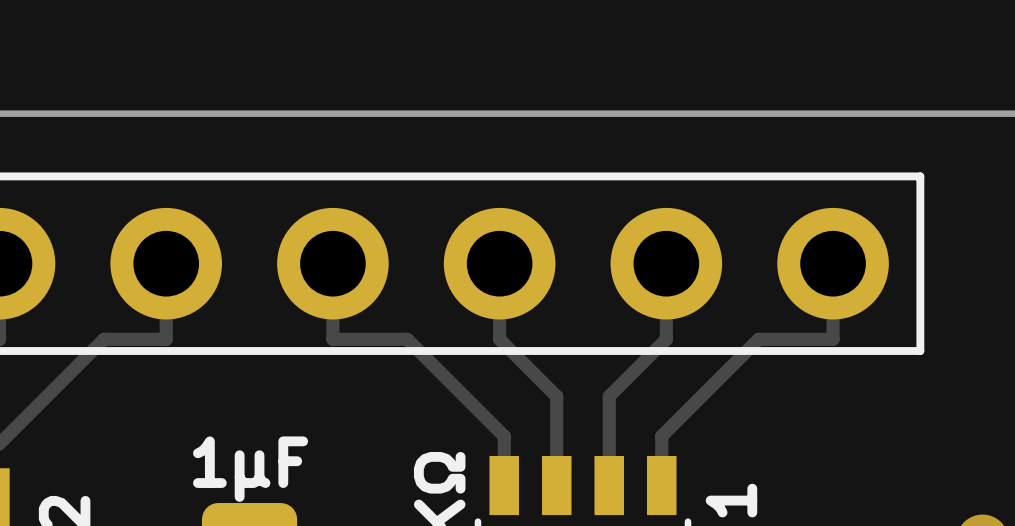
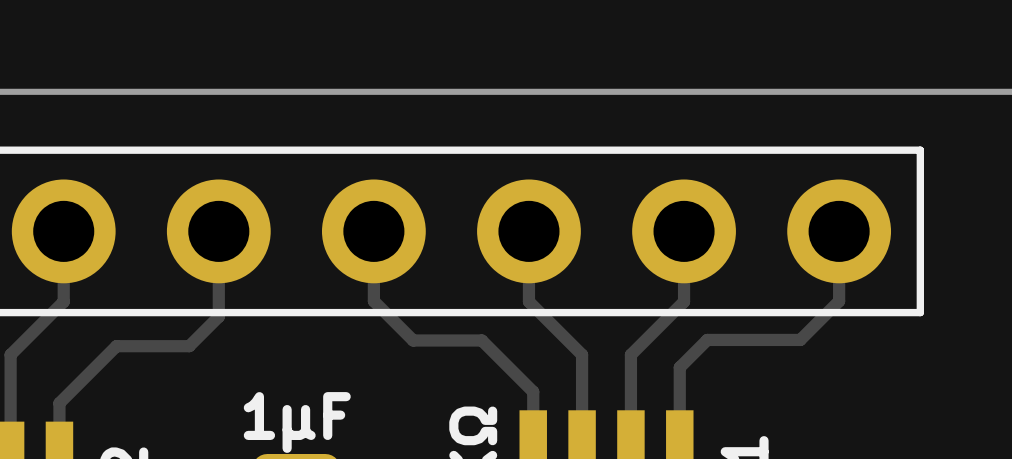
track: (166, 339) (104, 339) (56, 387) -> (218, 301) (218, 316) (189, 346) (116, 346)
track: (332, 339) (407, 339) (449, 381) -> (373, 301) (413, 340) (481, 340)
track: (833, 339) (758, 339) (661, 436) -> (839, 301) (800, 339) (707, 339) (679, 367) (679, 391)

